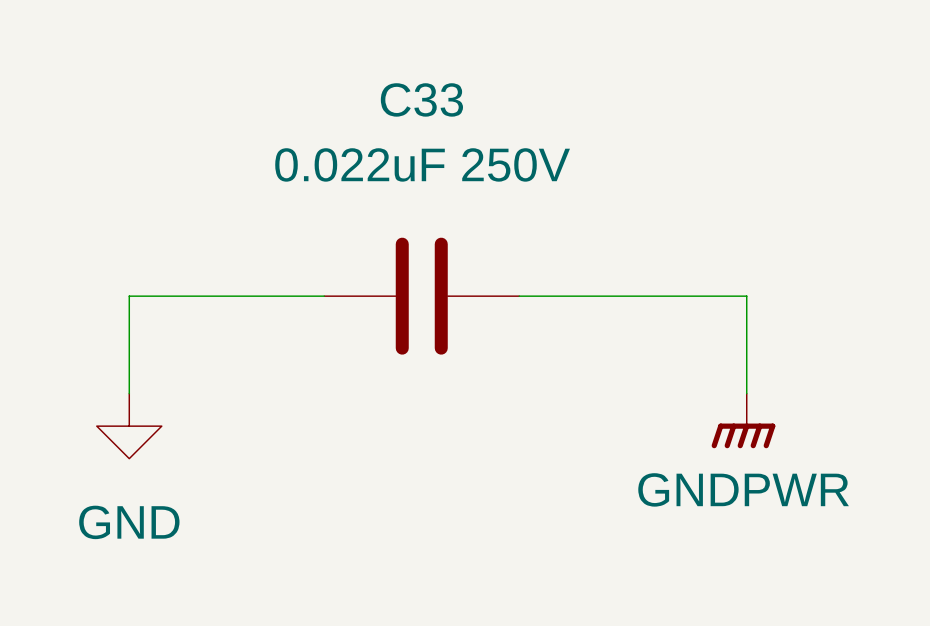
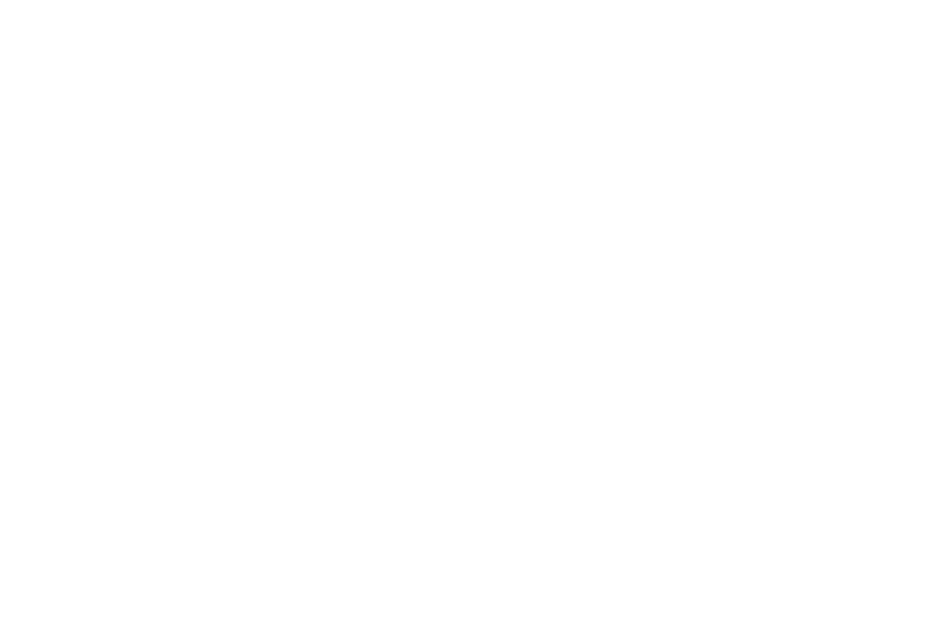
wire: (324, 296) (129, 296) (129, 393) -> none
C33: 0.022uF 250V (421, 296) -> none
wire: (519, 296) (746, 296) (746, 393) -> none
power symbol: GNDPWR (743, 420) -> none
power symbol: GND (129, 426) -> none

